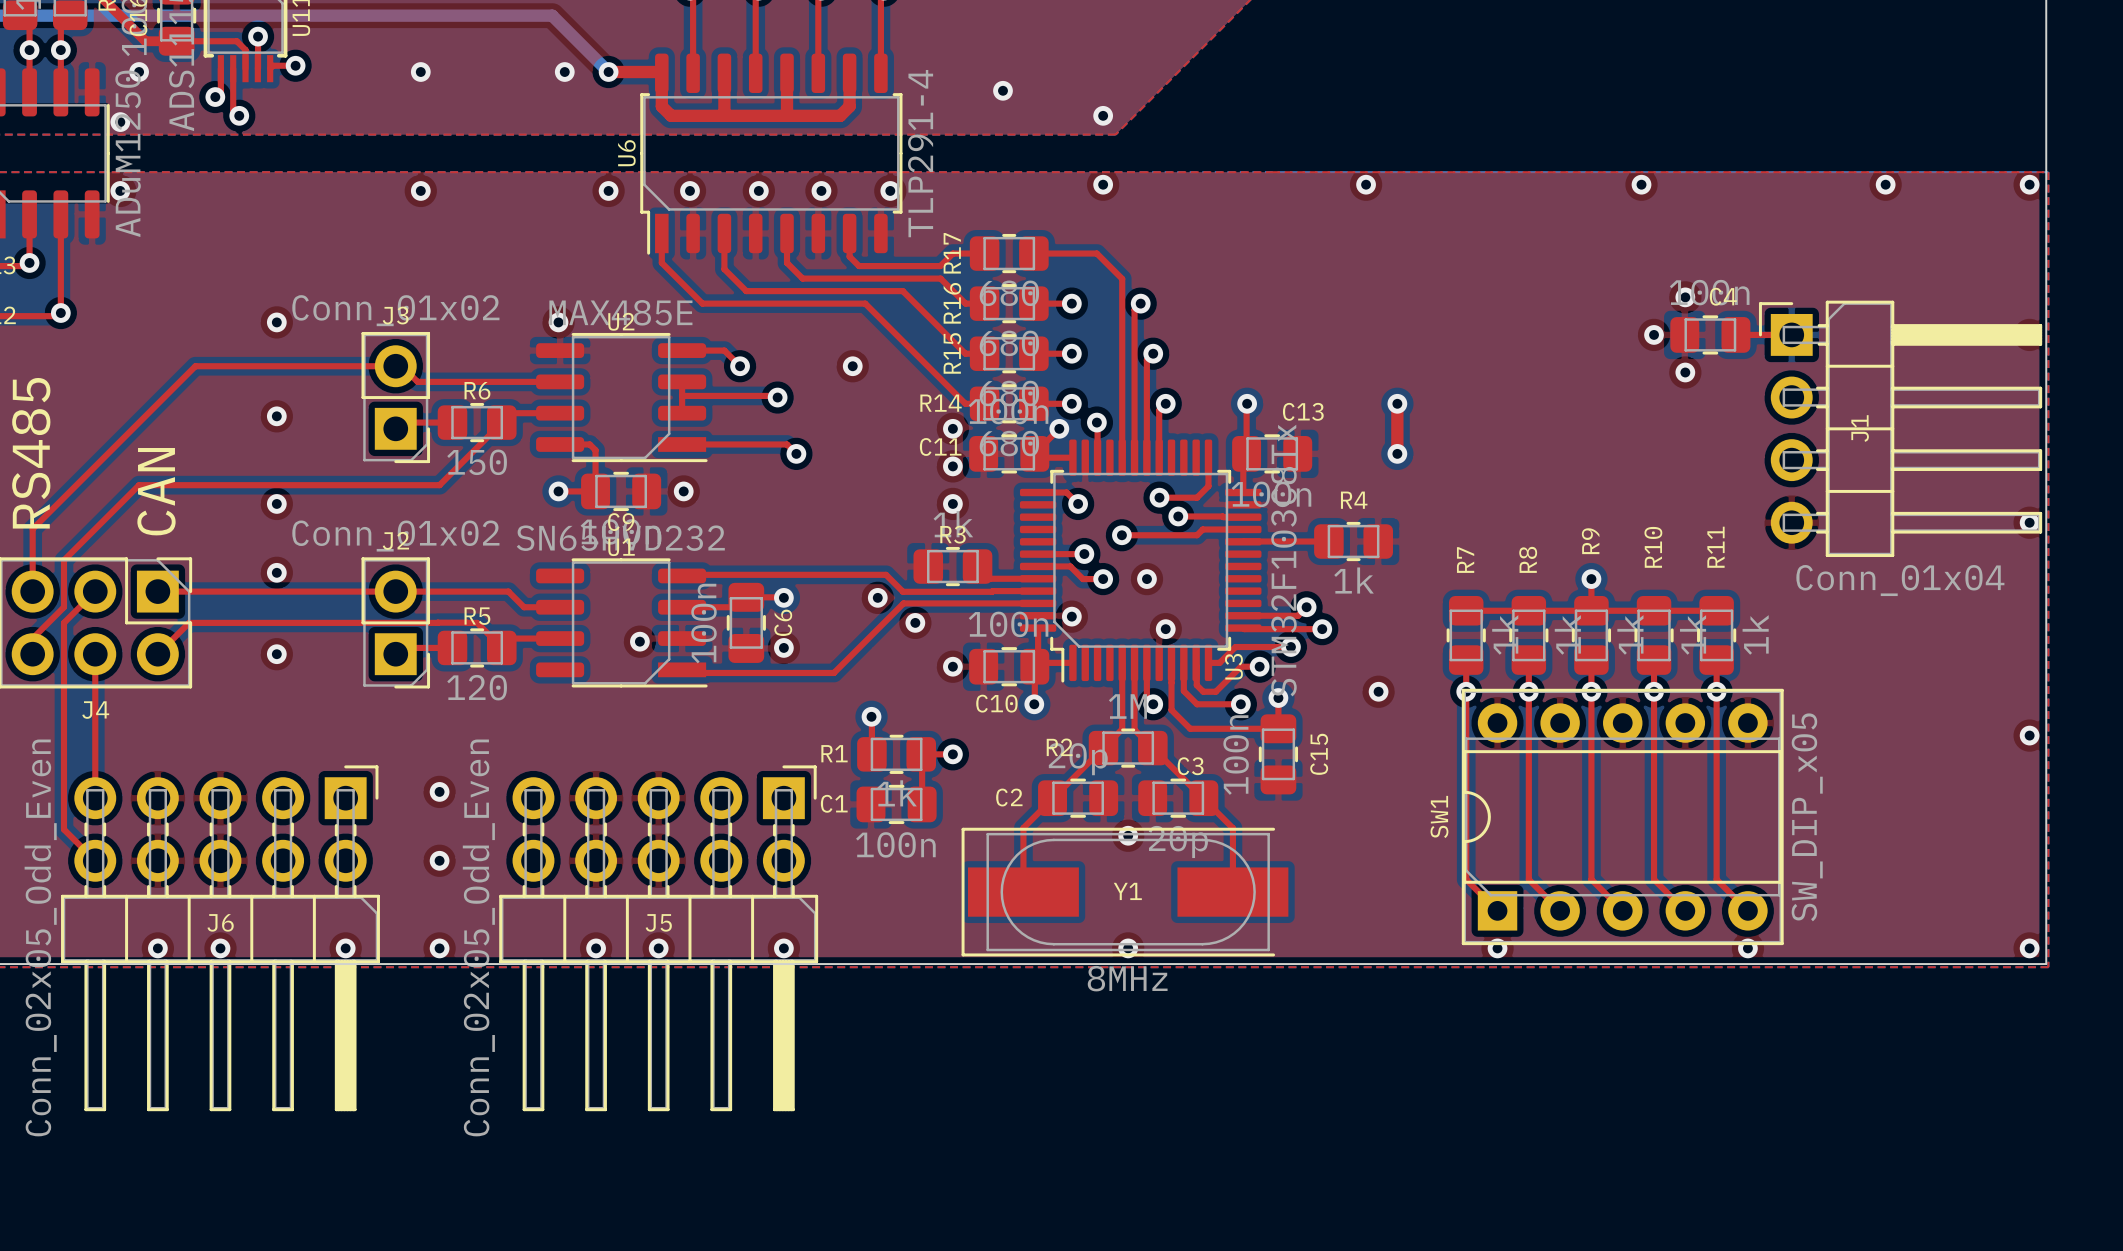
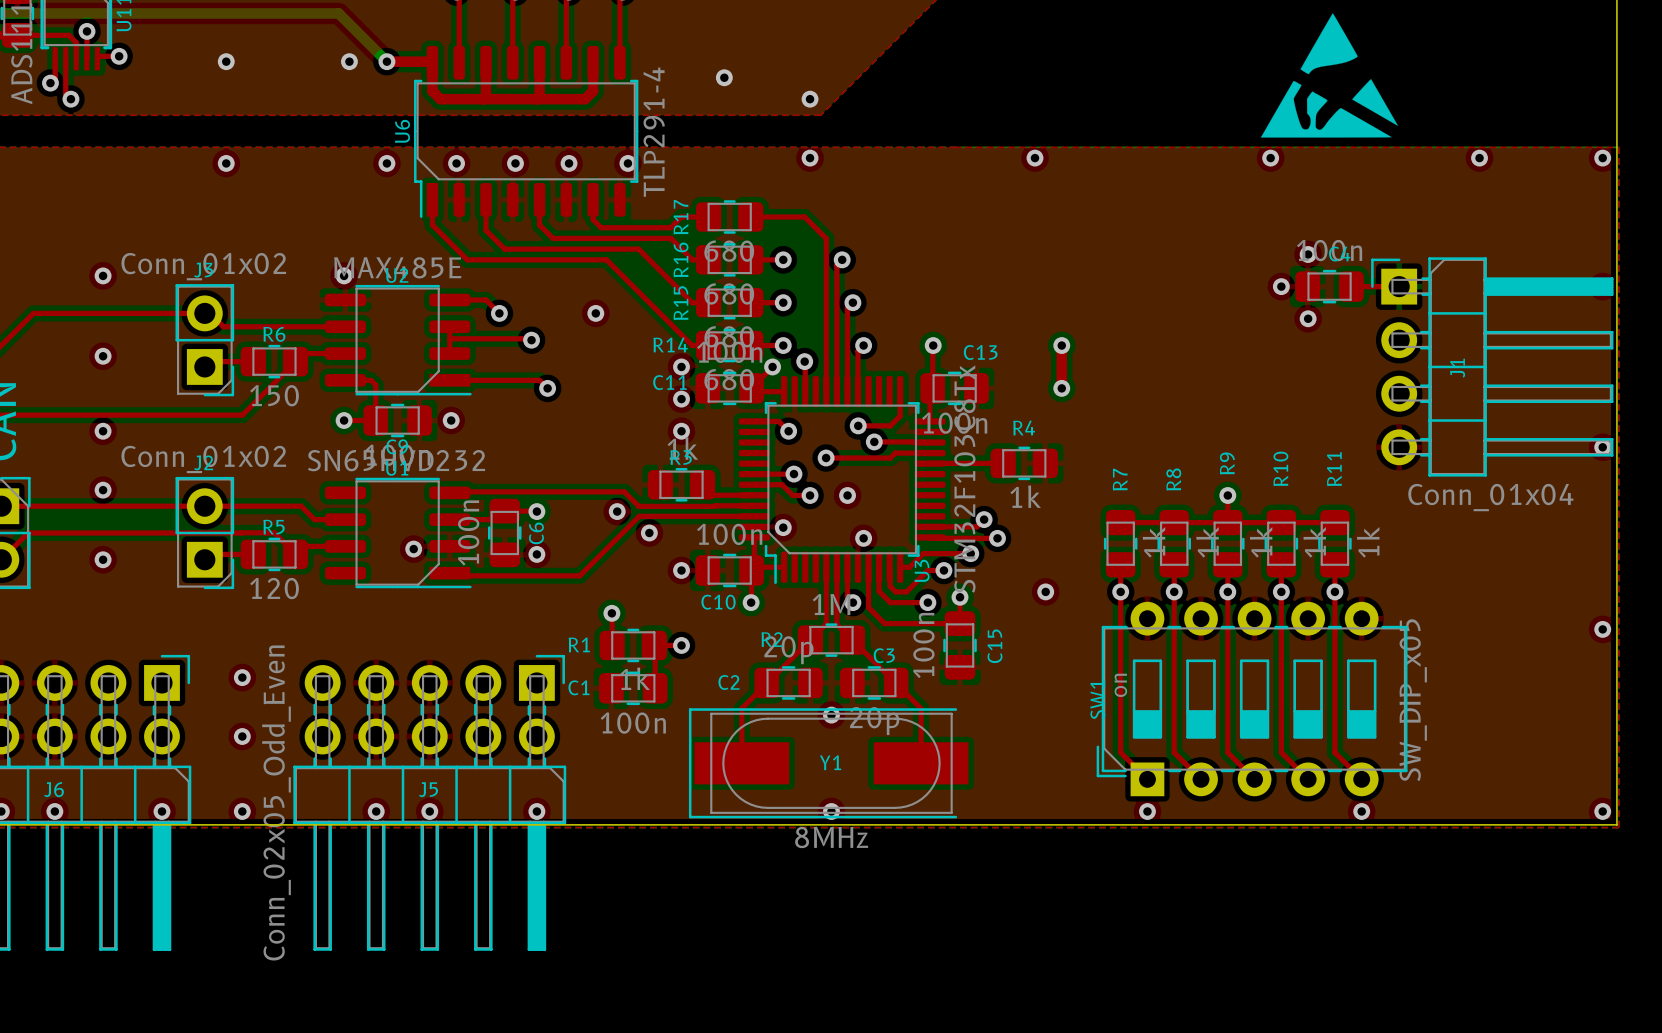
drawing: none -> [1260, 13, 1398, 138]
SW1 footprint: [1461, 688, 1784, 946] -> [1096, 601, 1408, 797]

